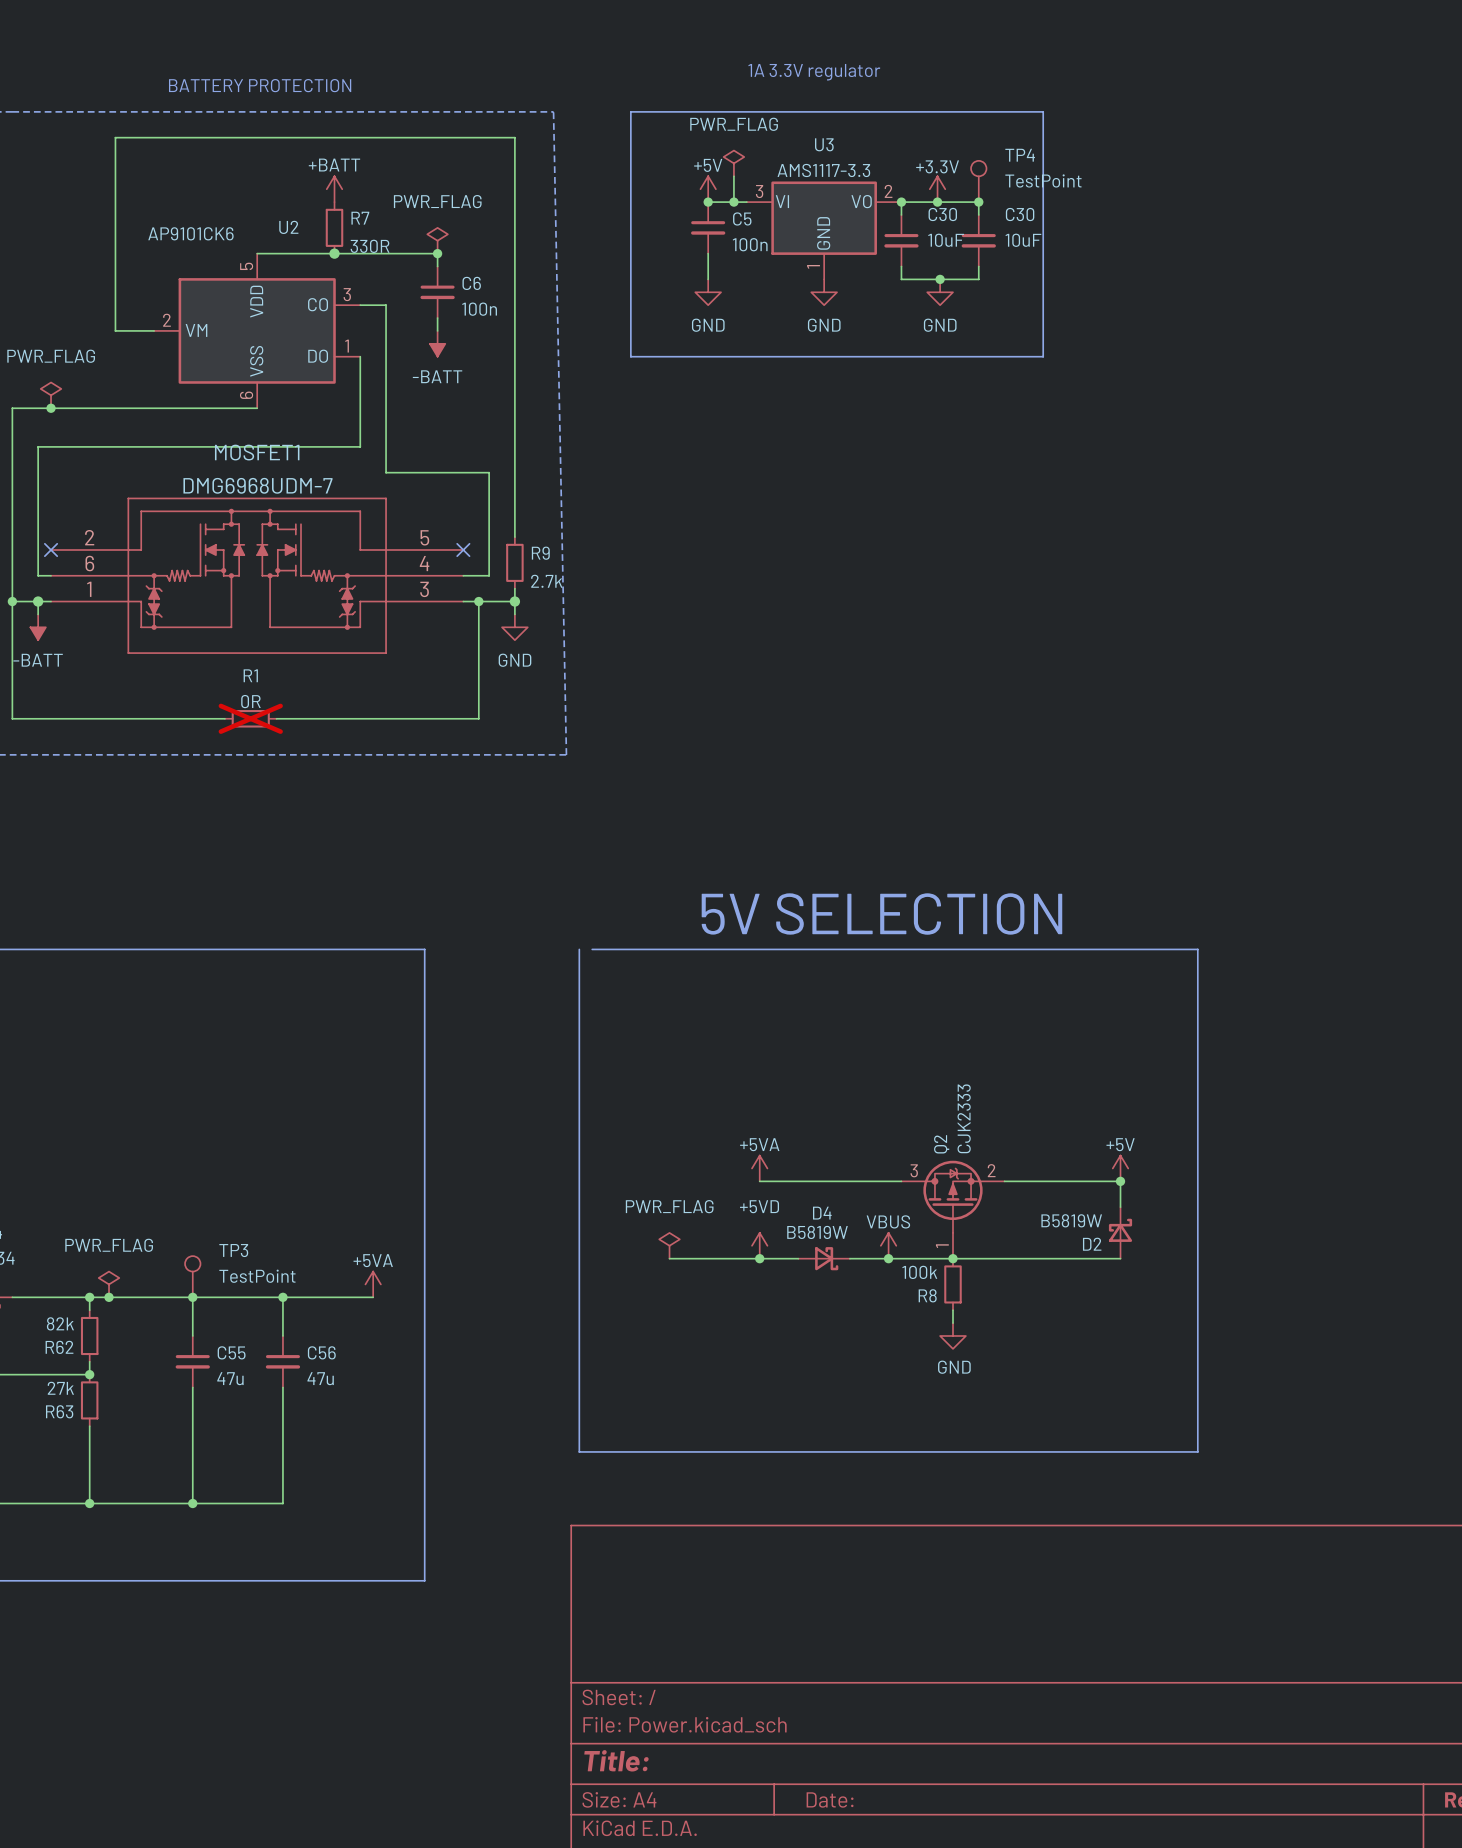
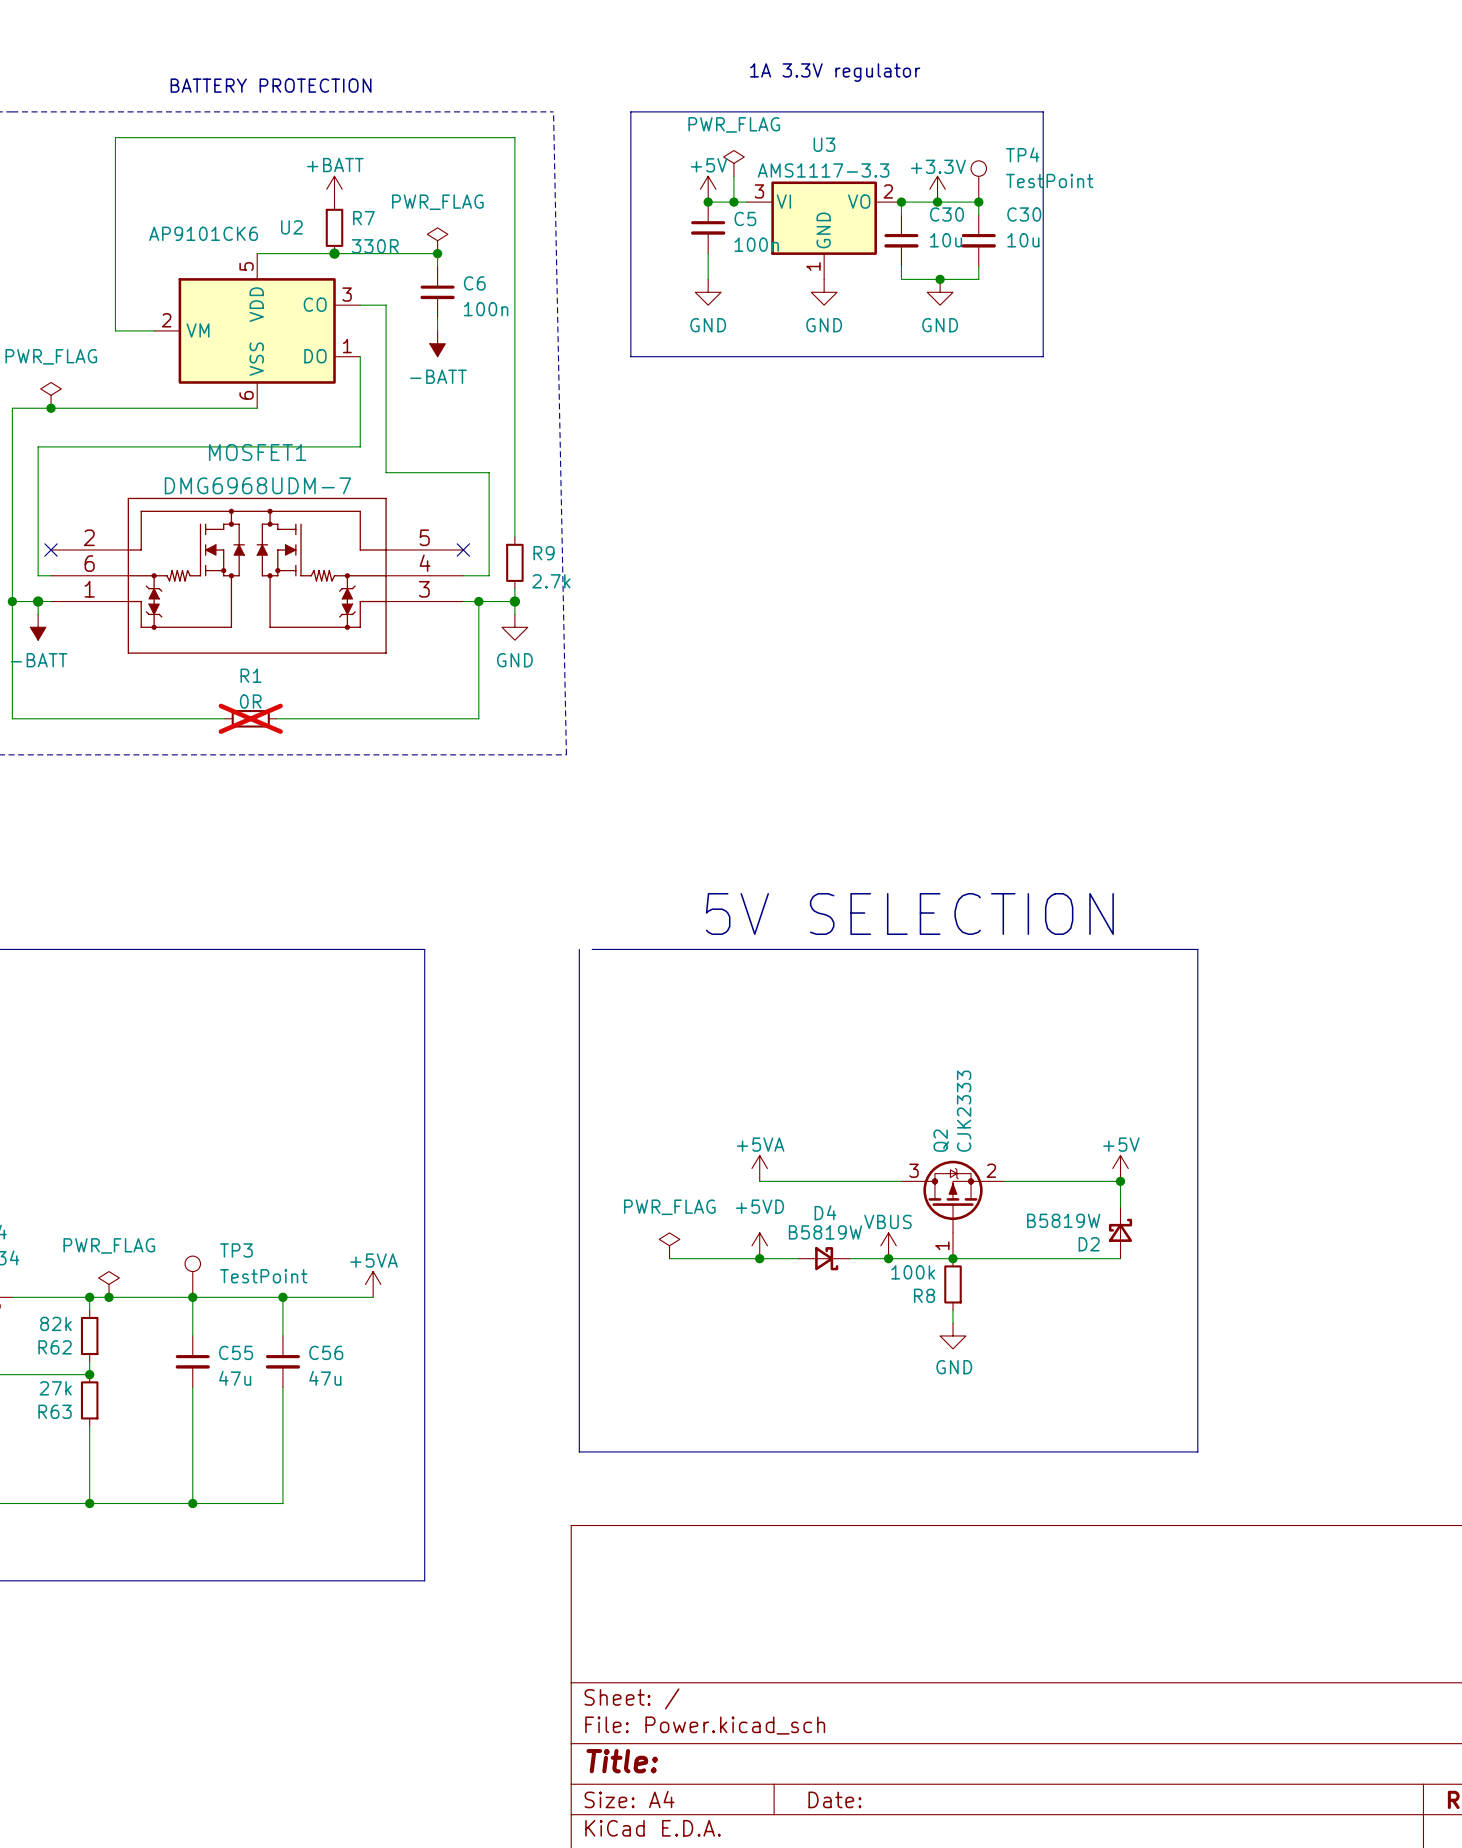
C30 value: 10uF (946, 240) -> 10u (946, 240)
C30 value: 10uF (1023, 240) -> 10u (1023, 240)

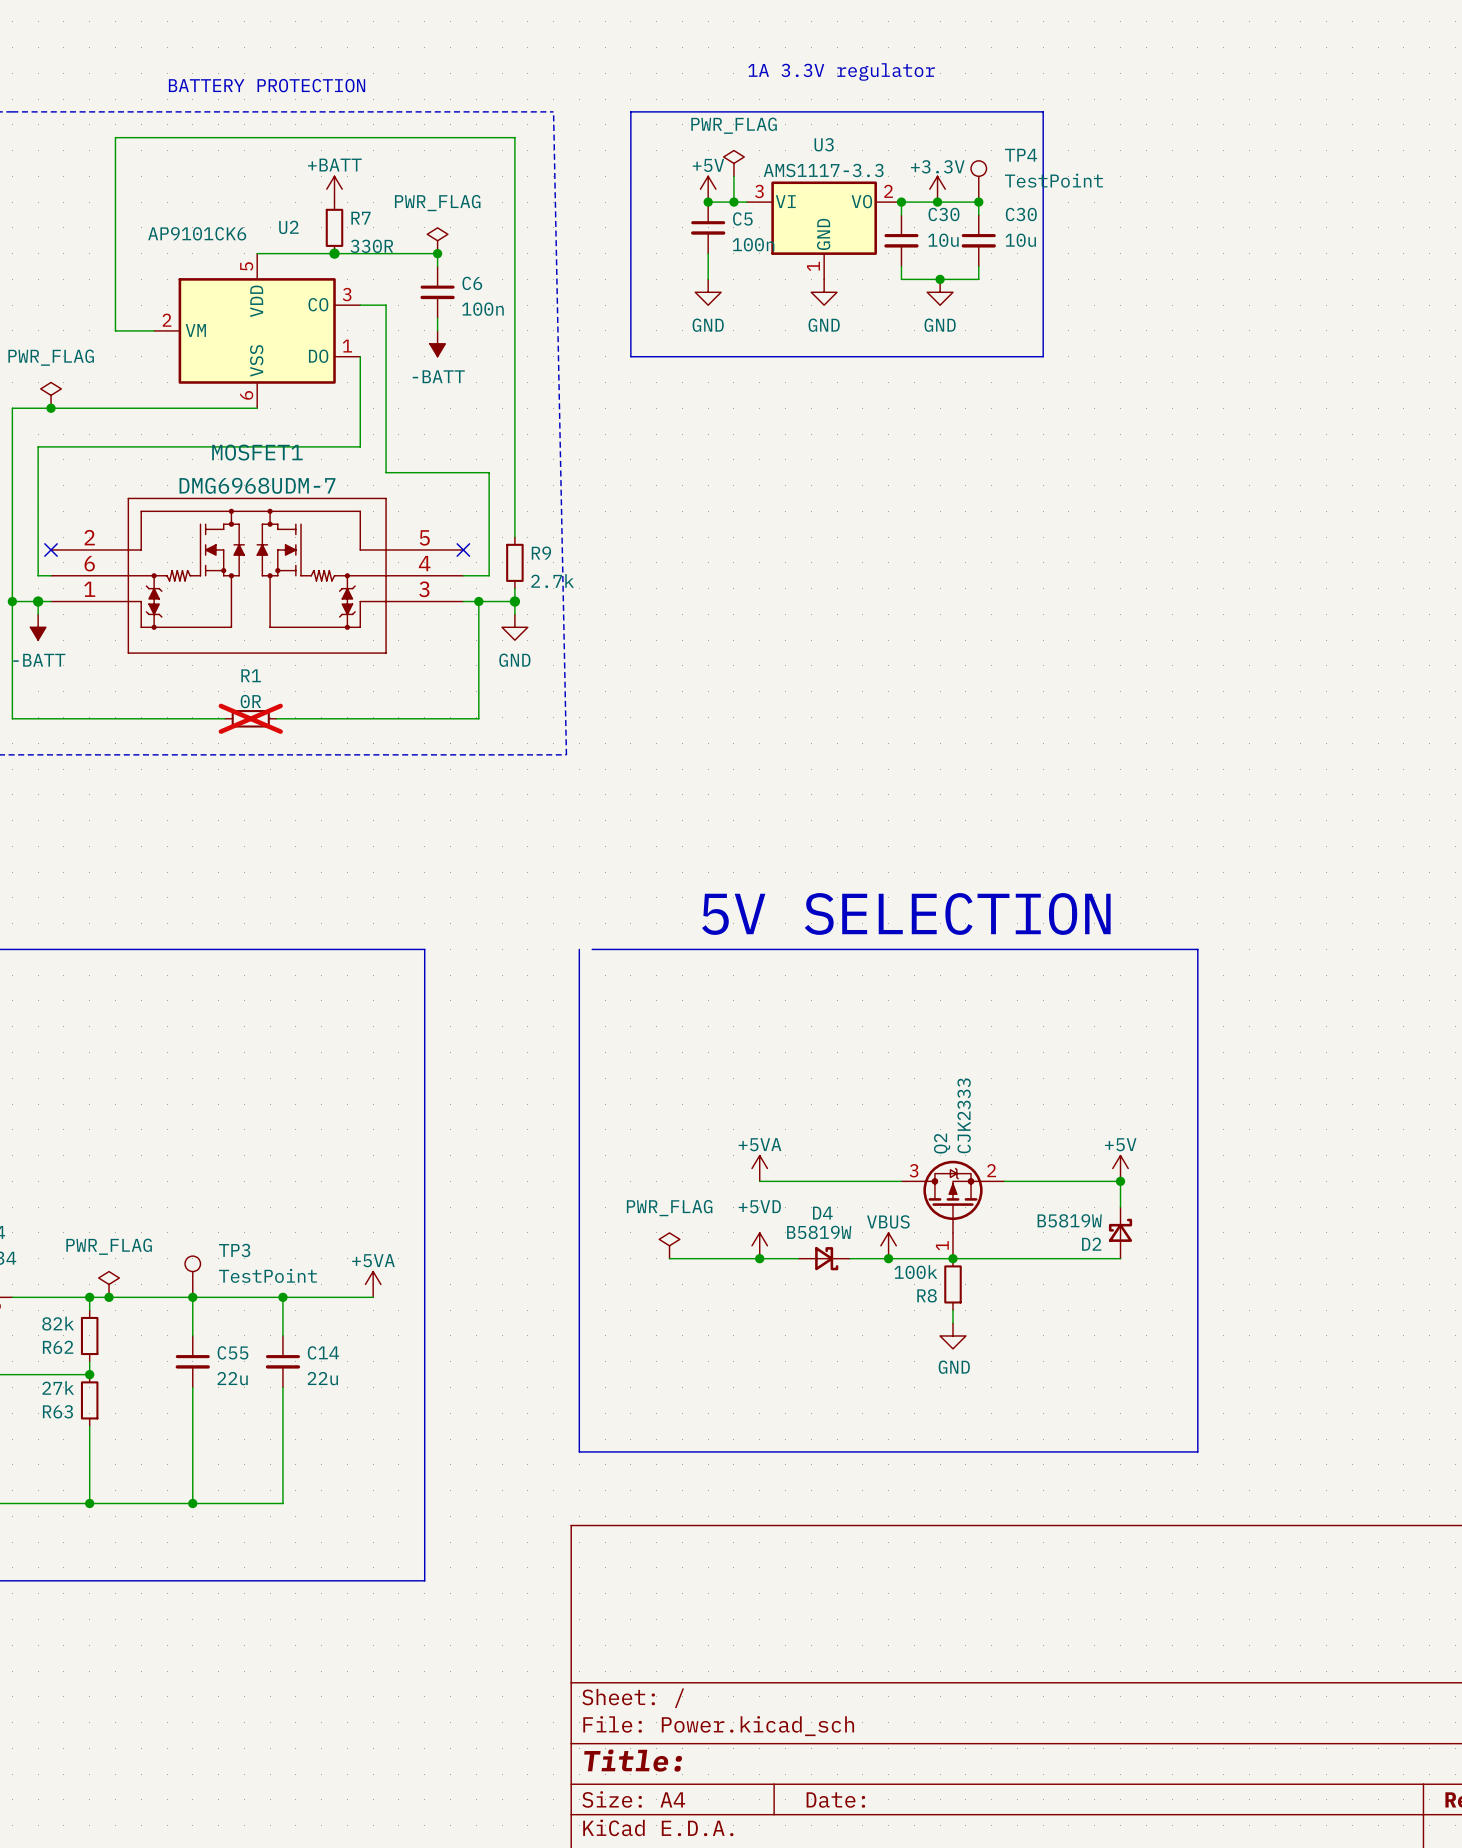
C56 name: C56 (326, 1352) -> C14 (323, 1352)
C55 value: 47u (235, 1378) -> 22u (232, 1378)
C56 value: 47u (325, 1378) -> 22u (322, 1378)

